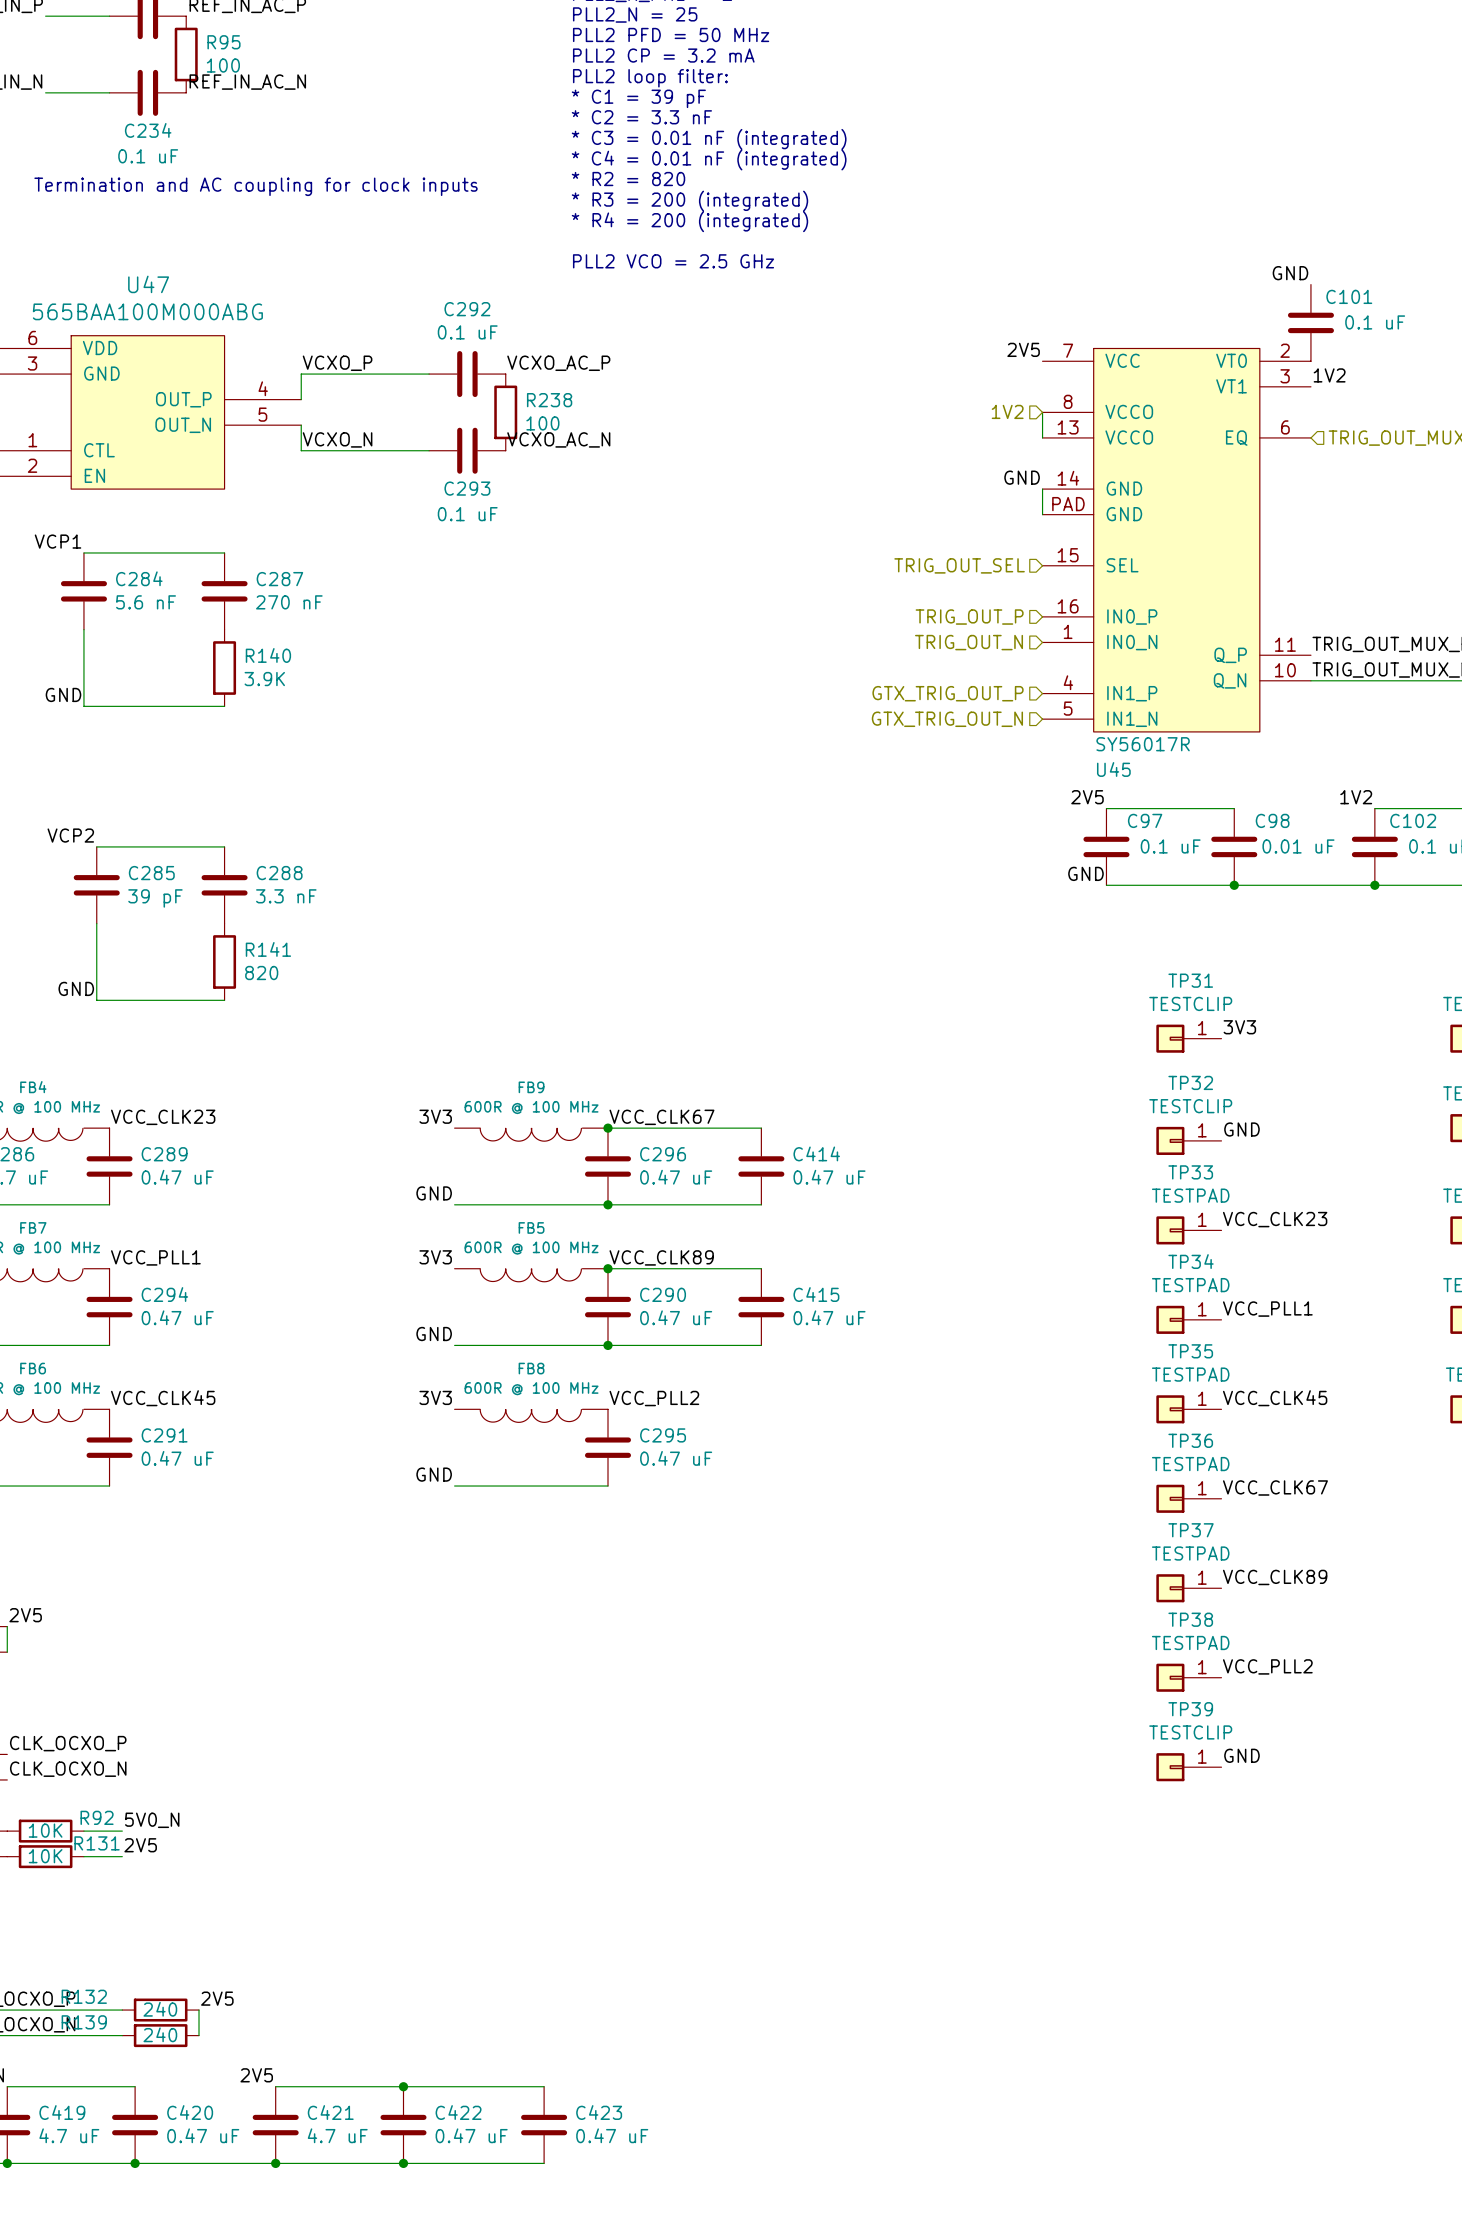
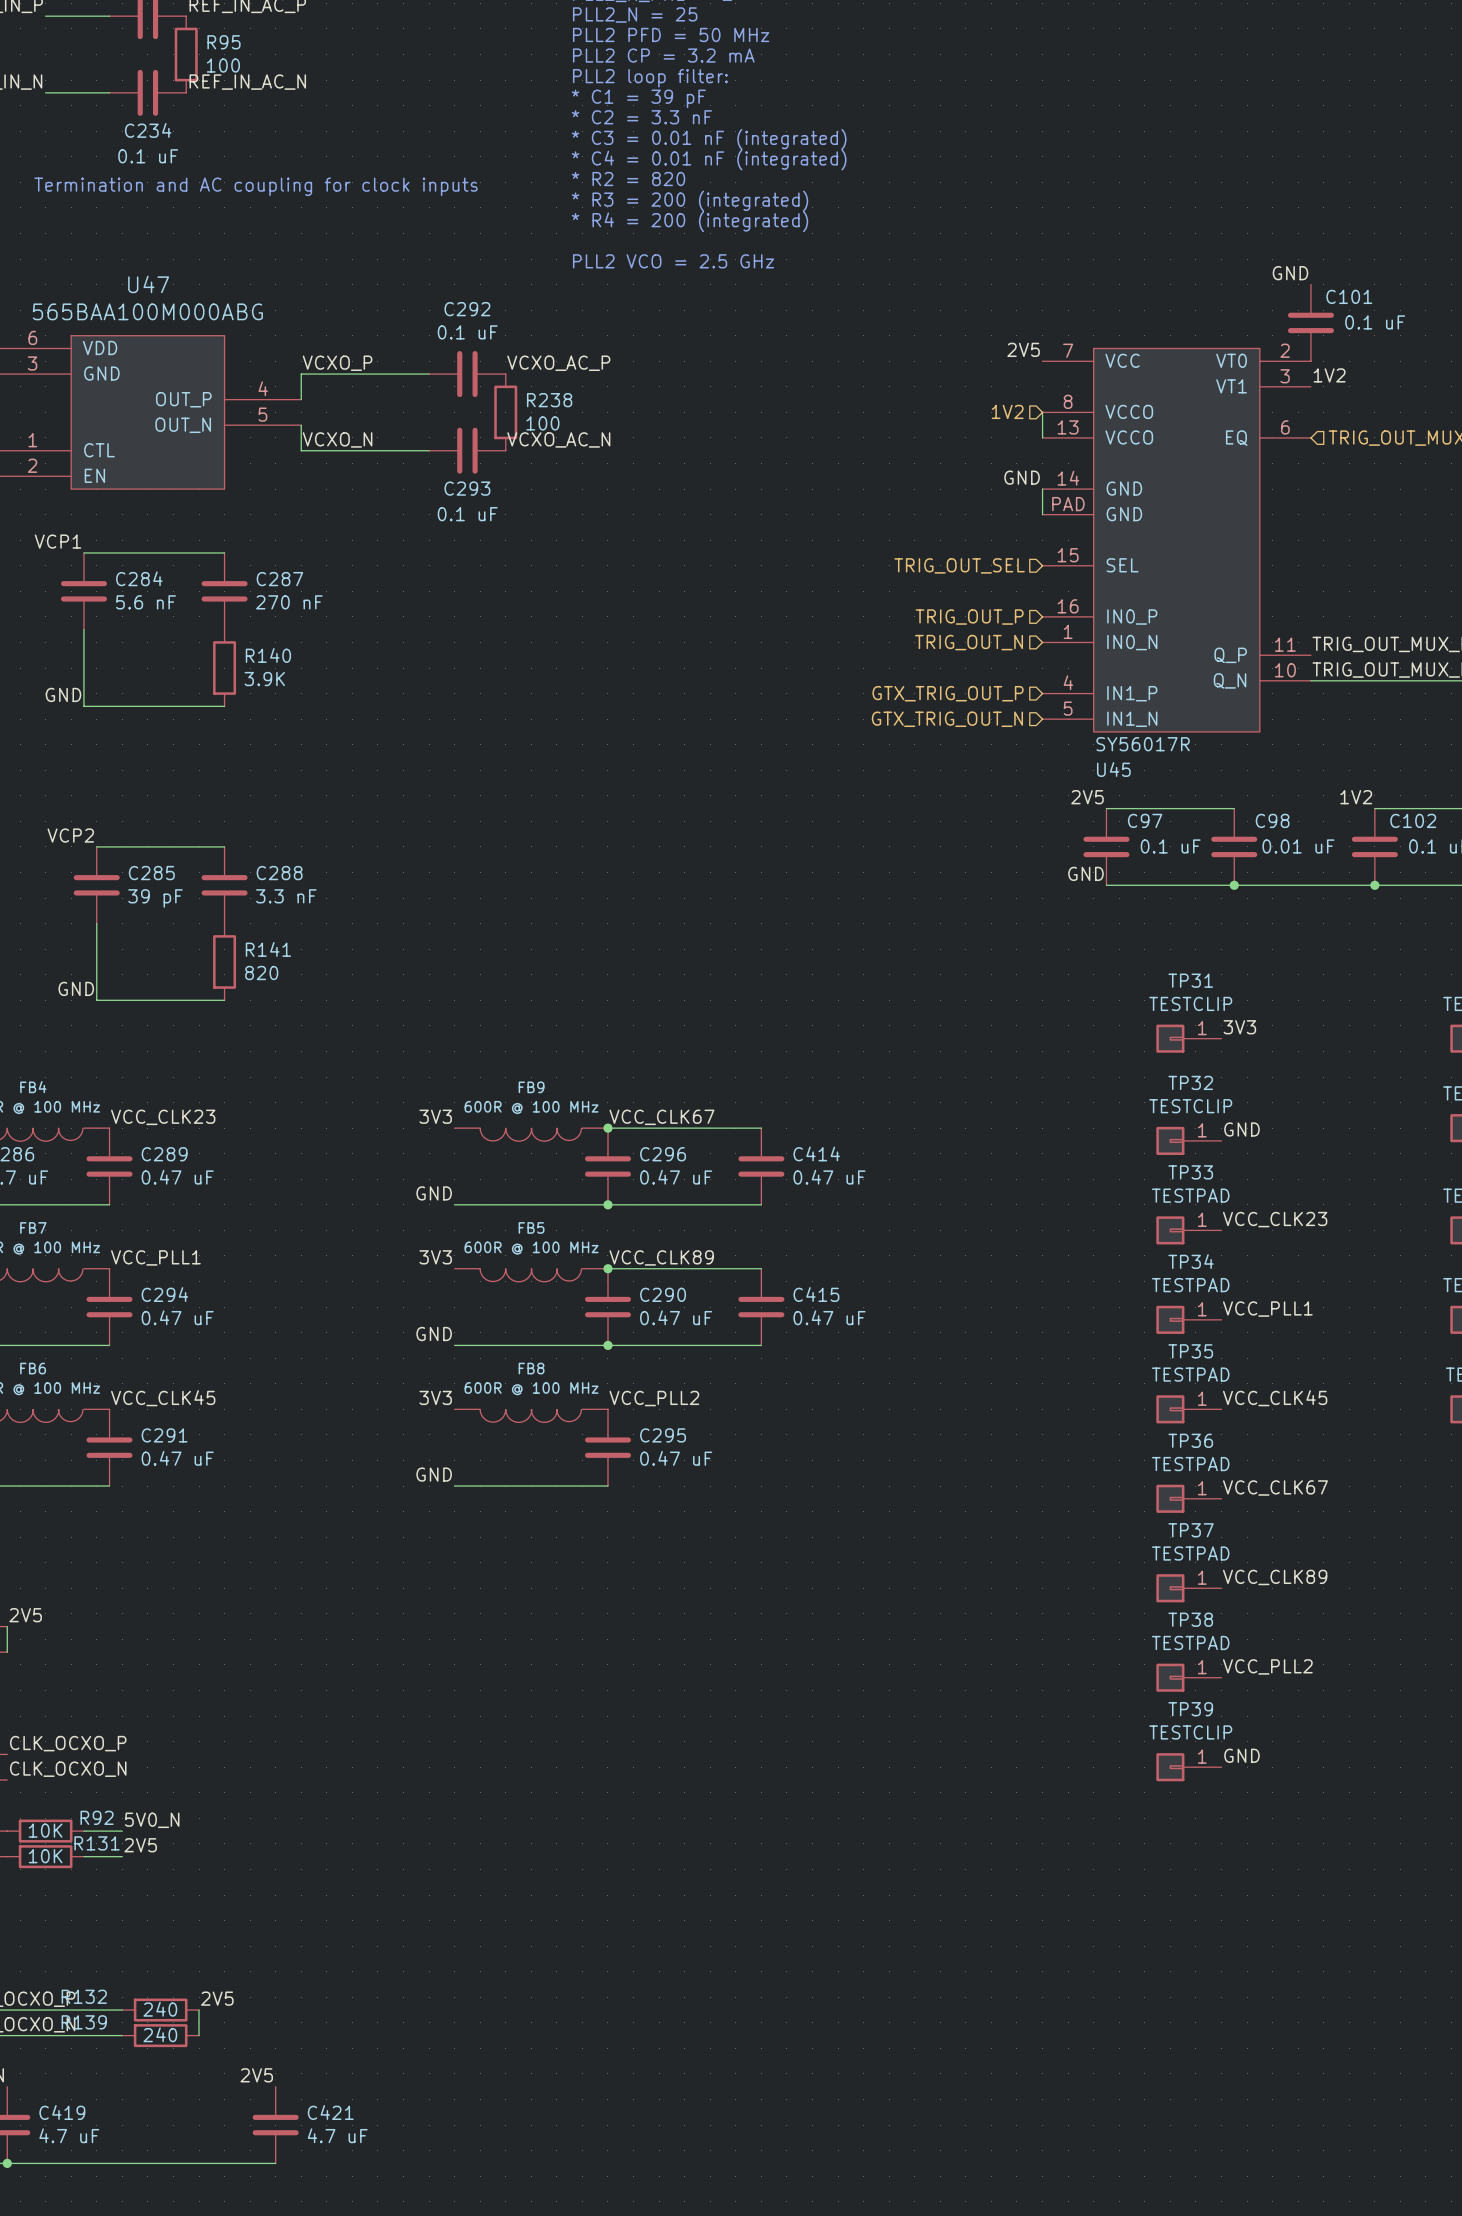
wire: (7, 2086) (135, 2086) -> none
wire: (275, 2086) (544, 2086) -> none
junction: (403, 2086) -> none
C420: 0.47 uF (135, 2125) -> none
C422: 0.47 uF (403, 2125) -> none
C423: 0.47 uF (544, 2125) -> none
junction: (135, 2163) -> none
wire: (275, 2163) (544, 2163) -> none
junction: (275, 2163) -> none
junction: (403, 2163) -> none

